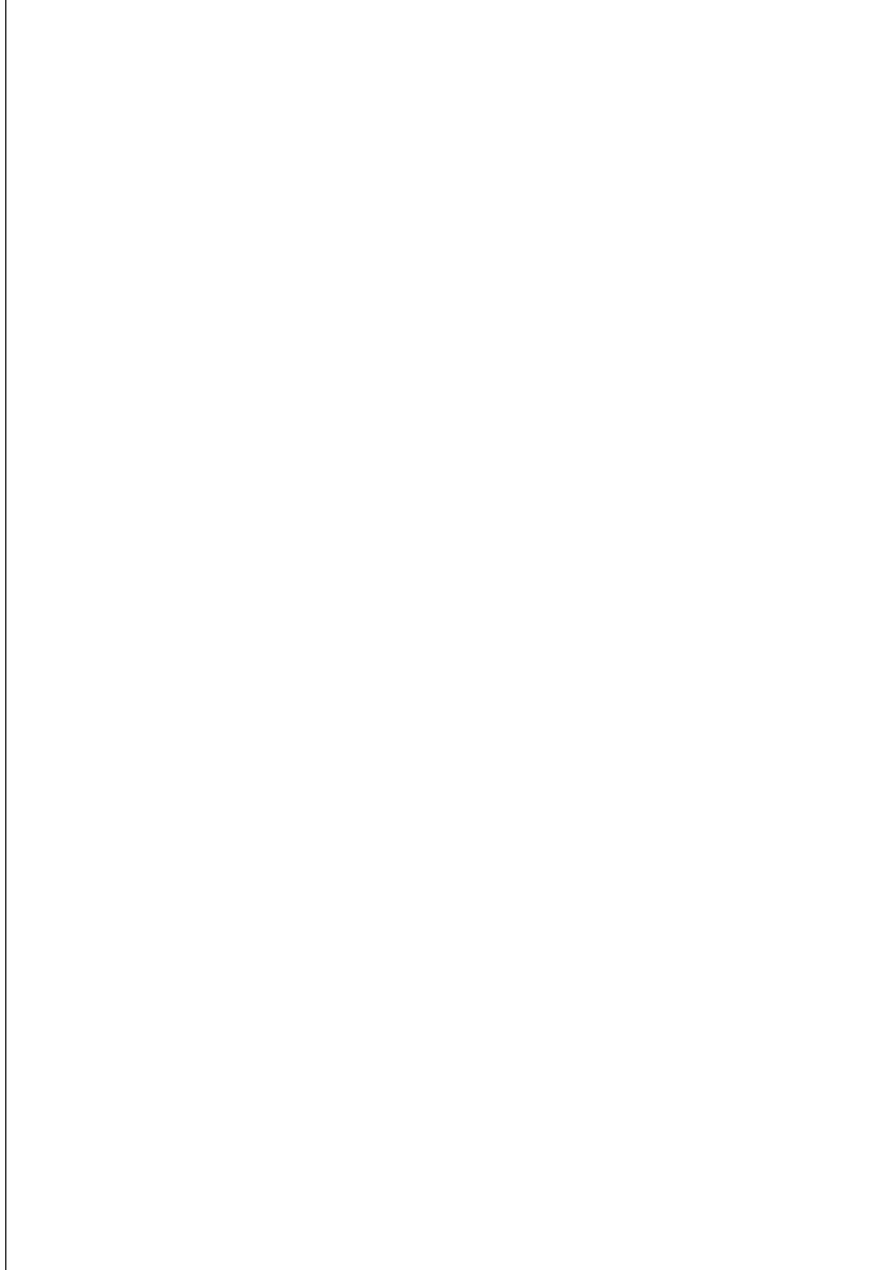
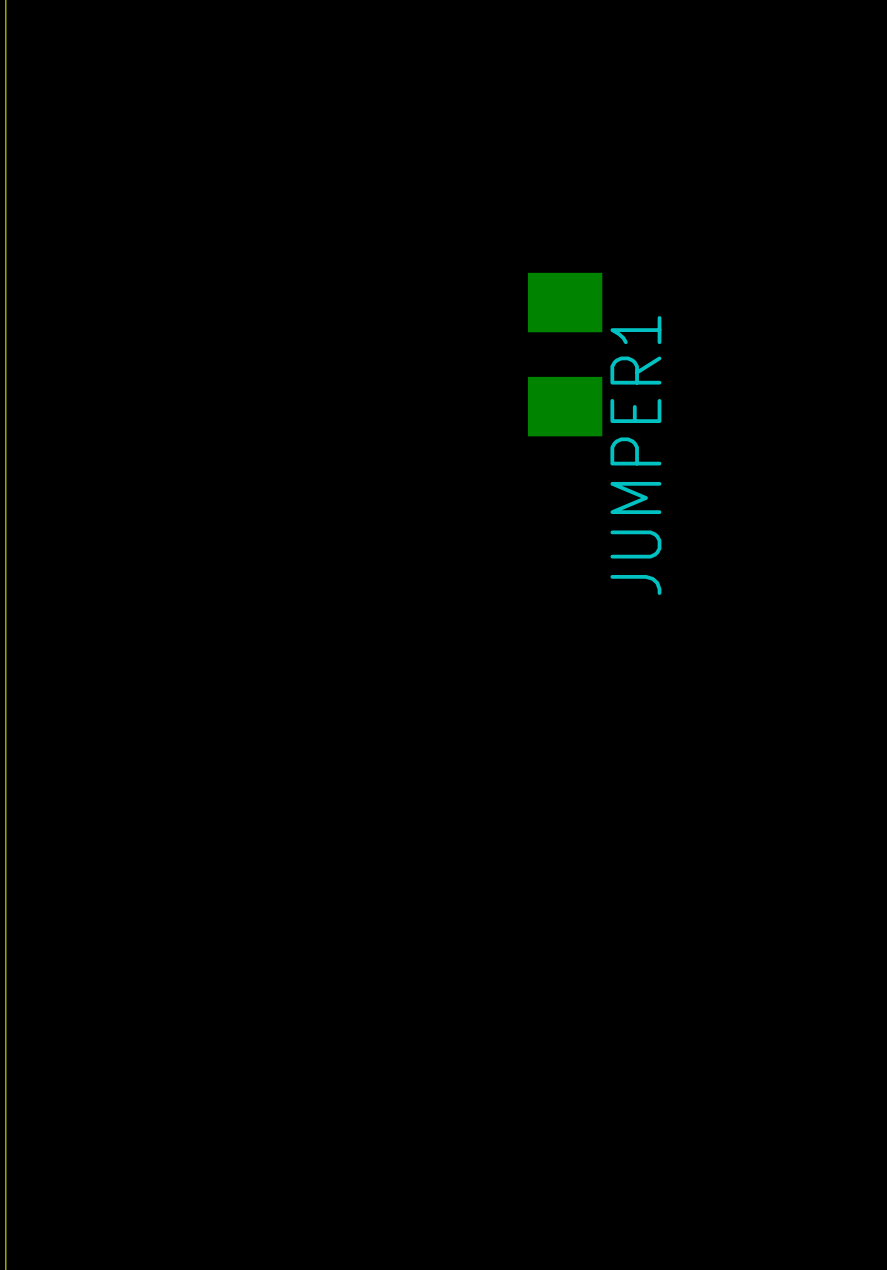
JUMPER1: none -> (565, 354)

